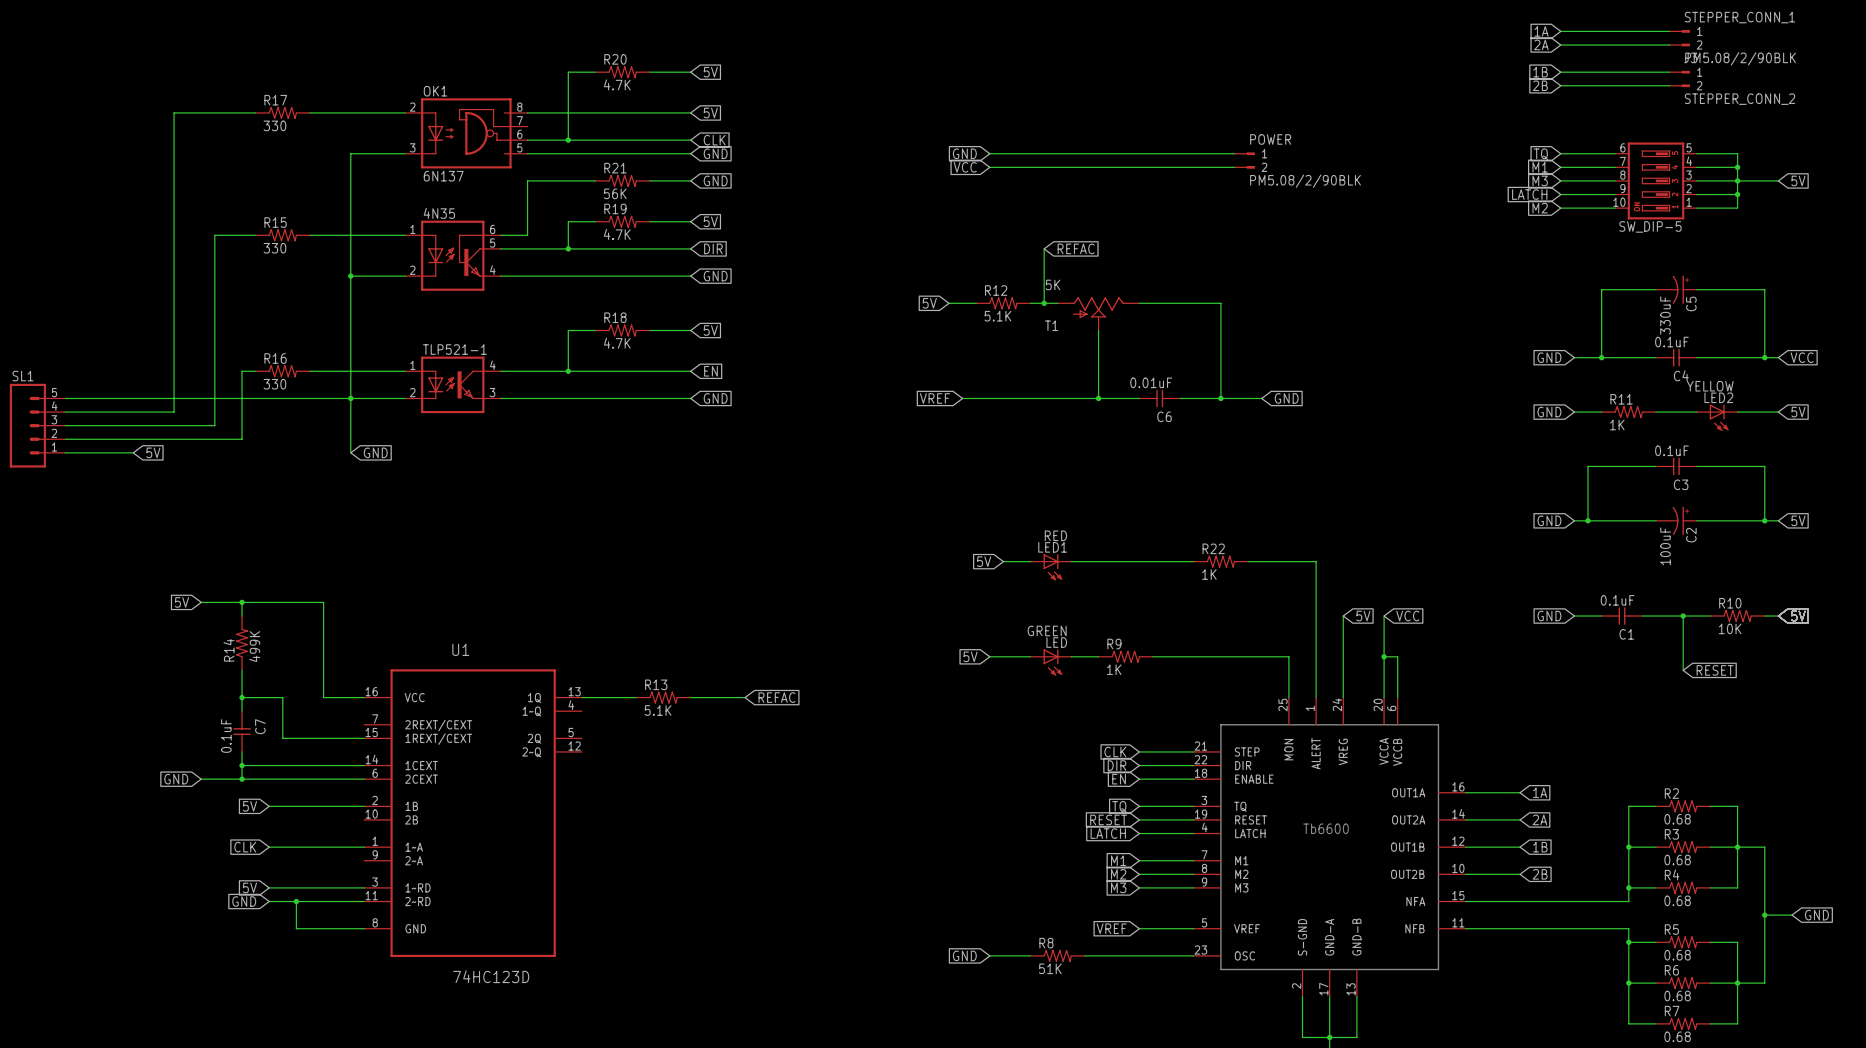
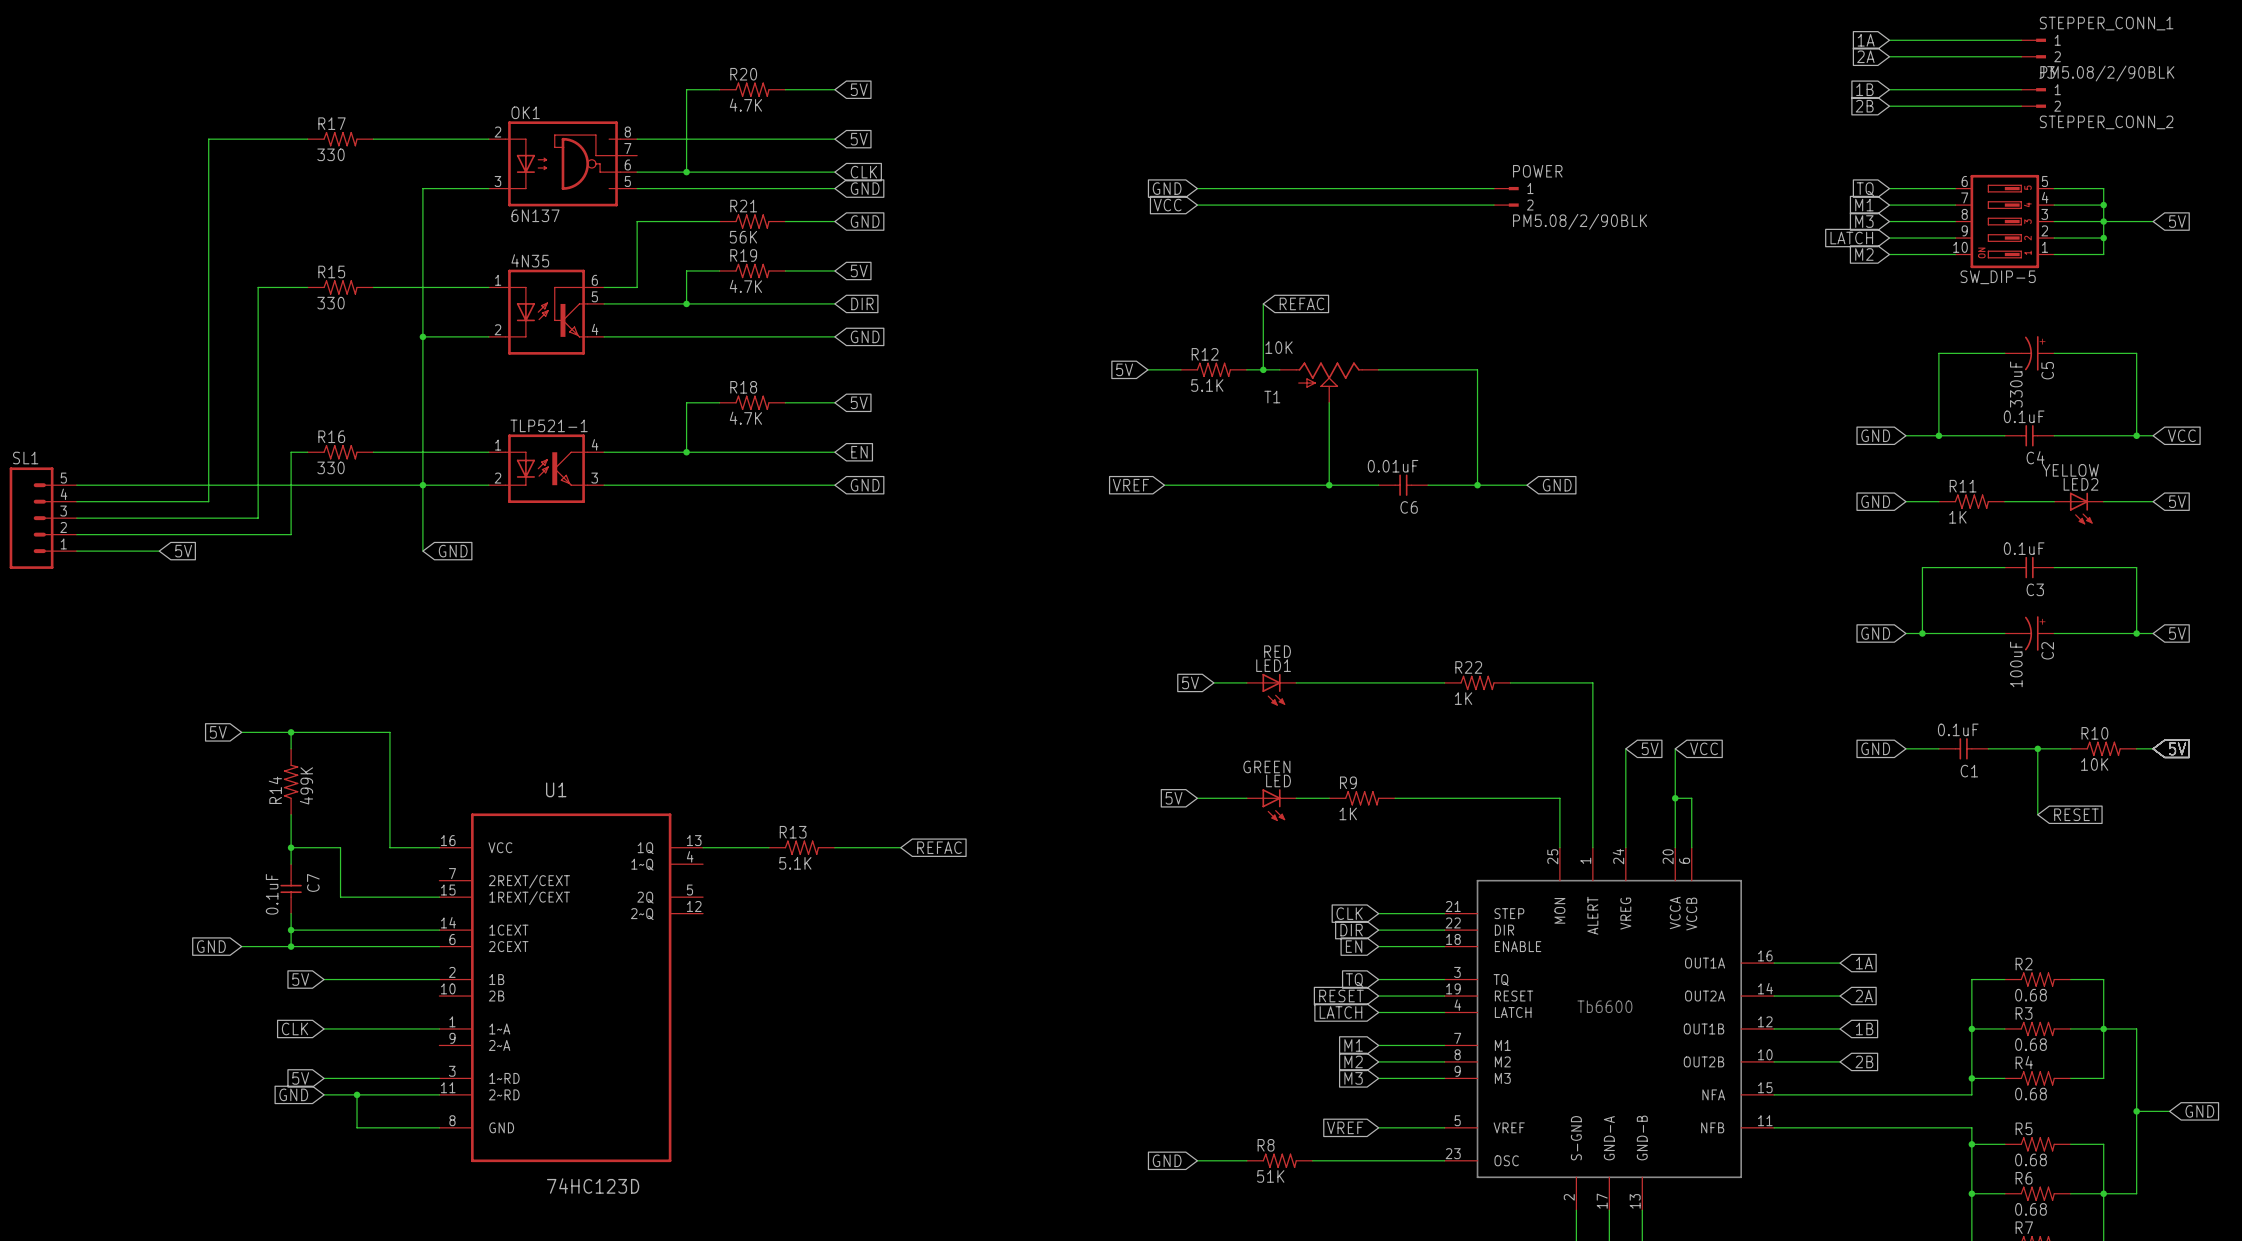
T1 value: 5K (1053, 284) -> 10K (1278, 347)

